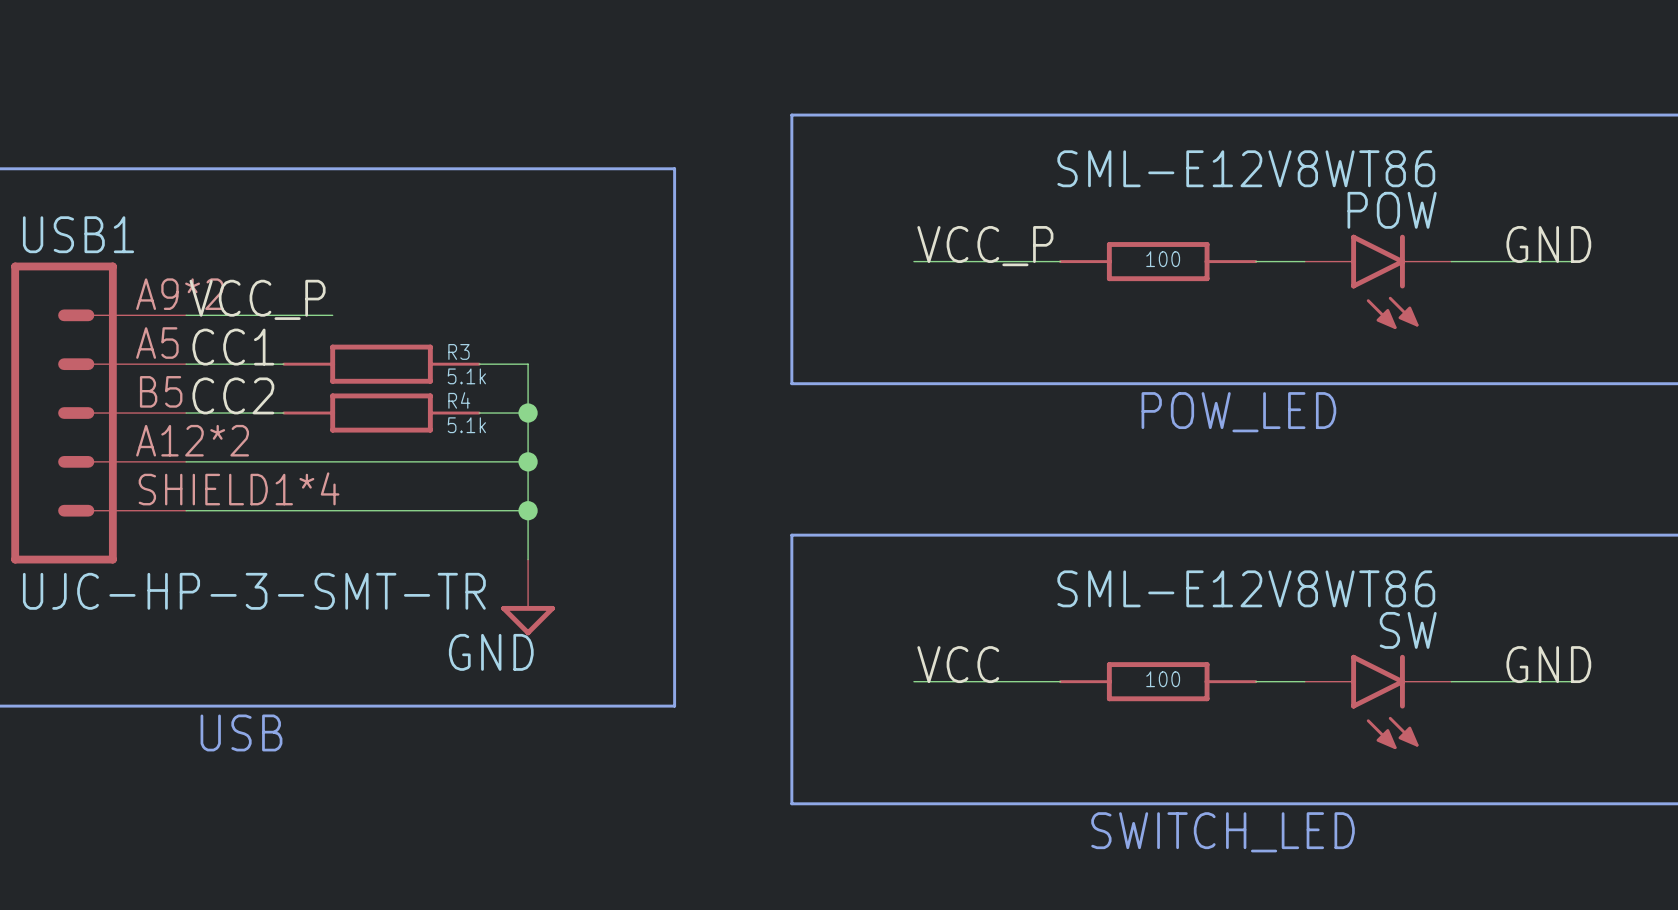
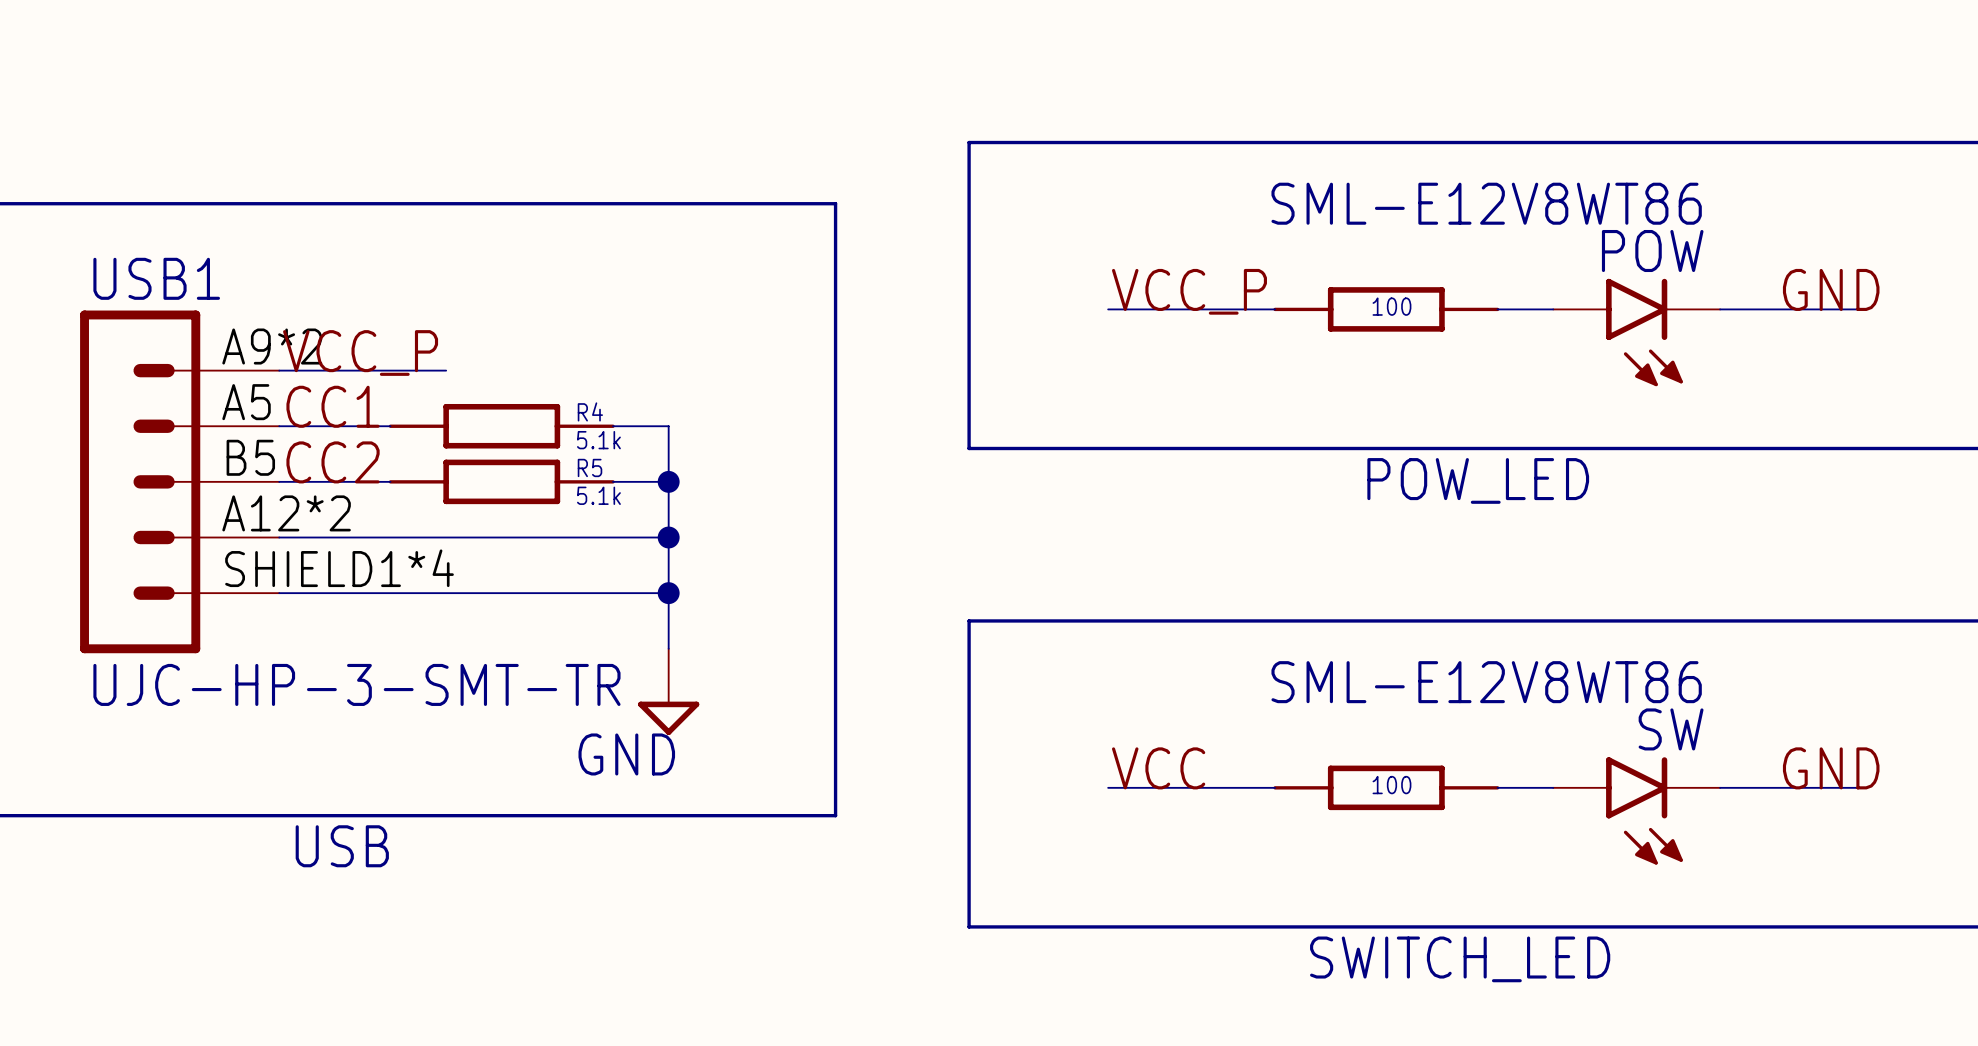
R3 name: R3 (458, 351) -> R4 (590, 411)
R4 name: R4 (459, 400) -> R5 (589, 467)

